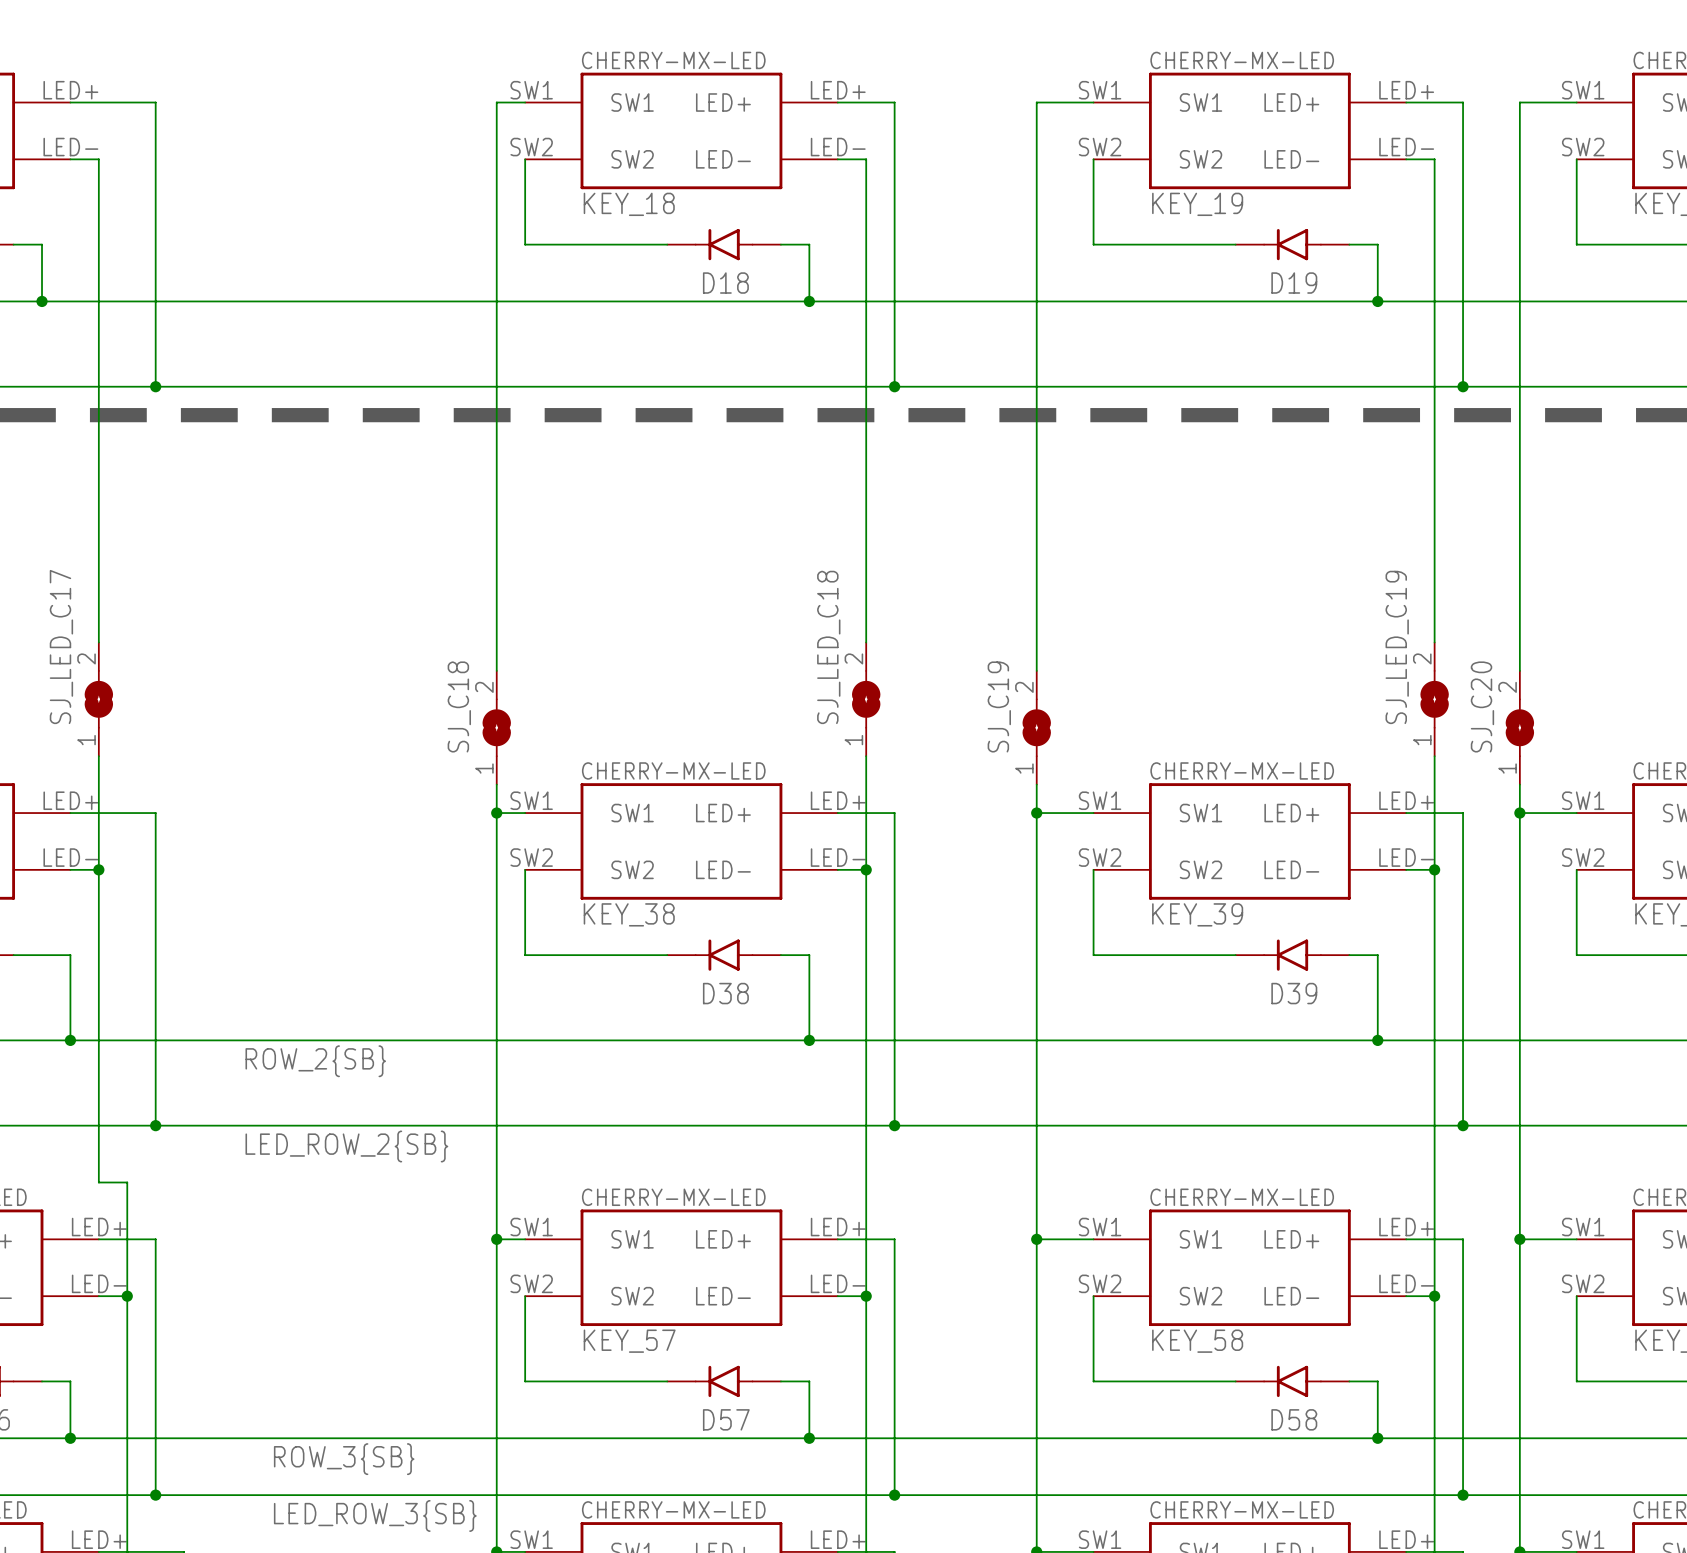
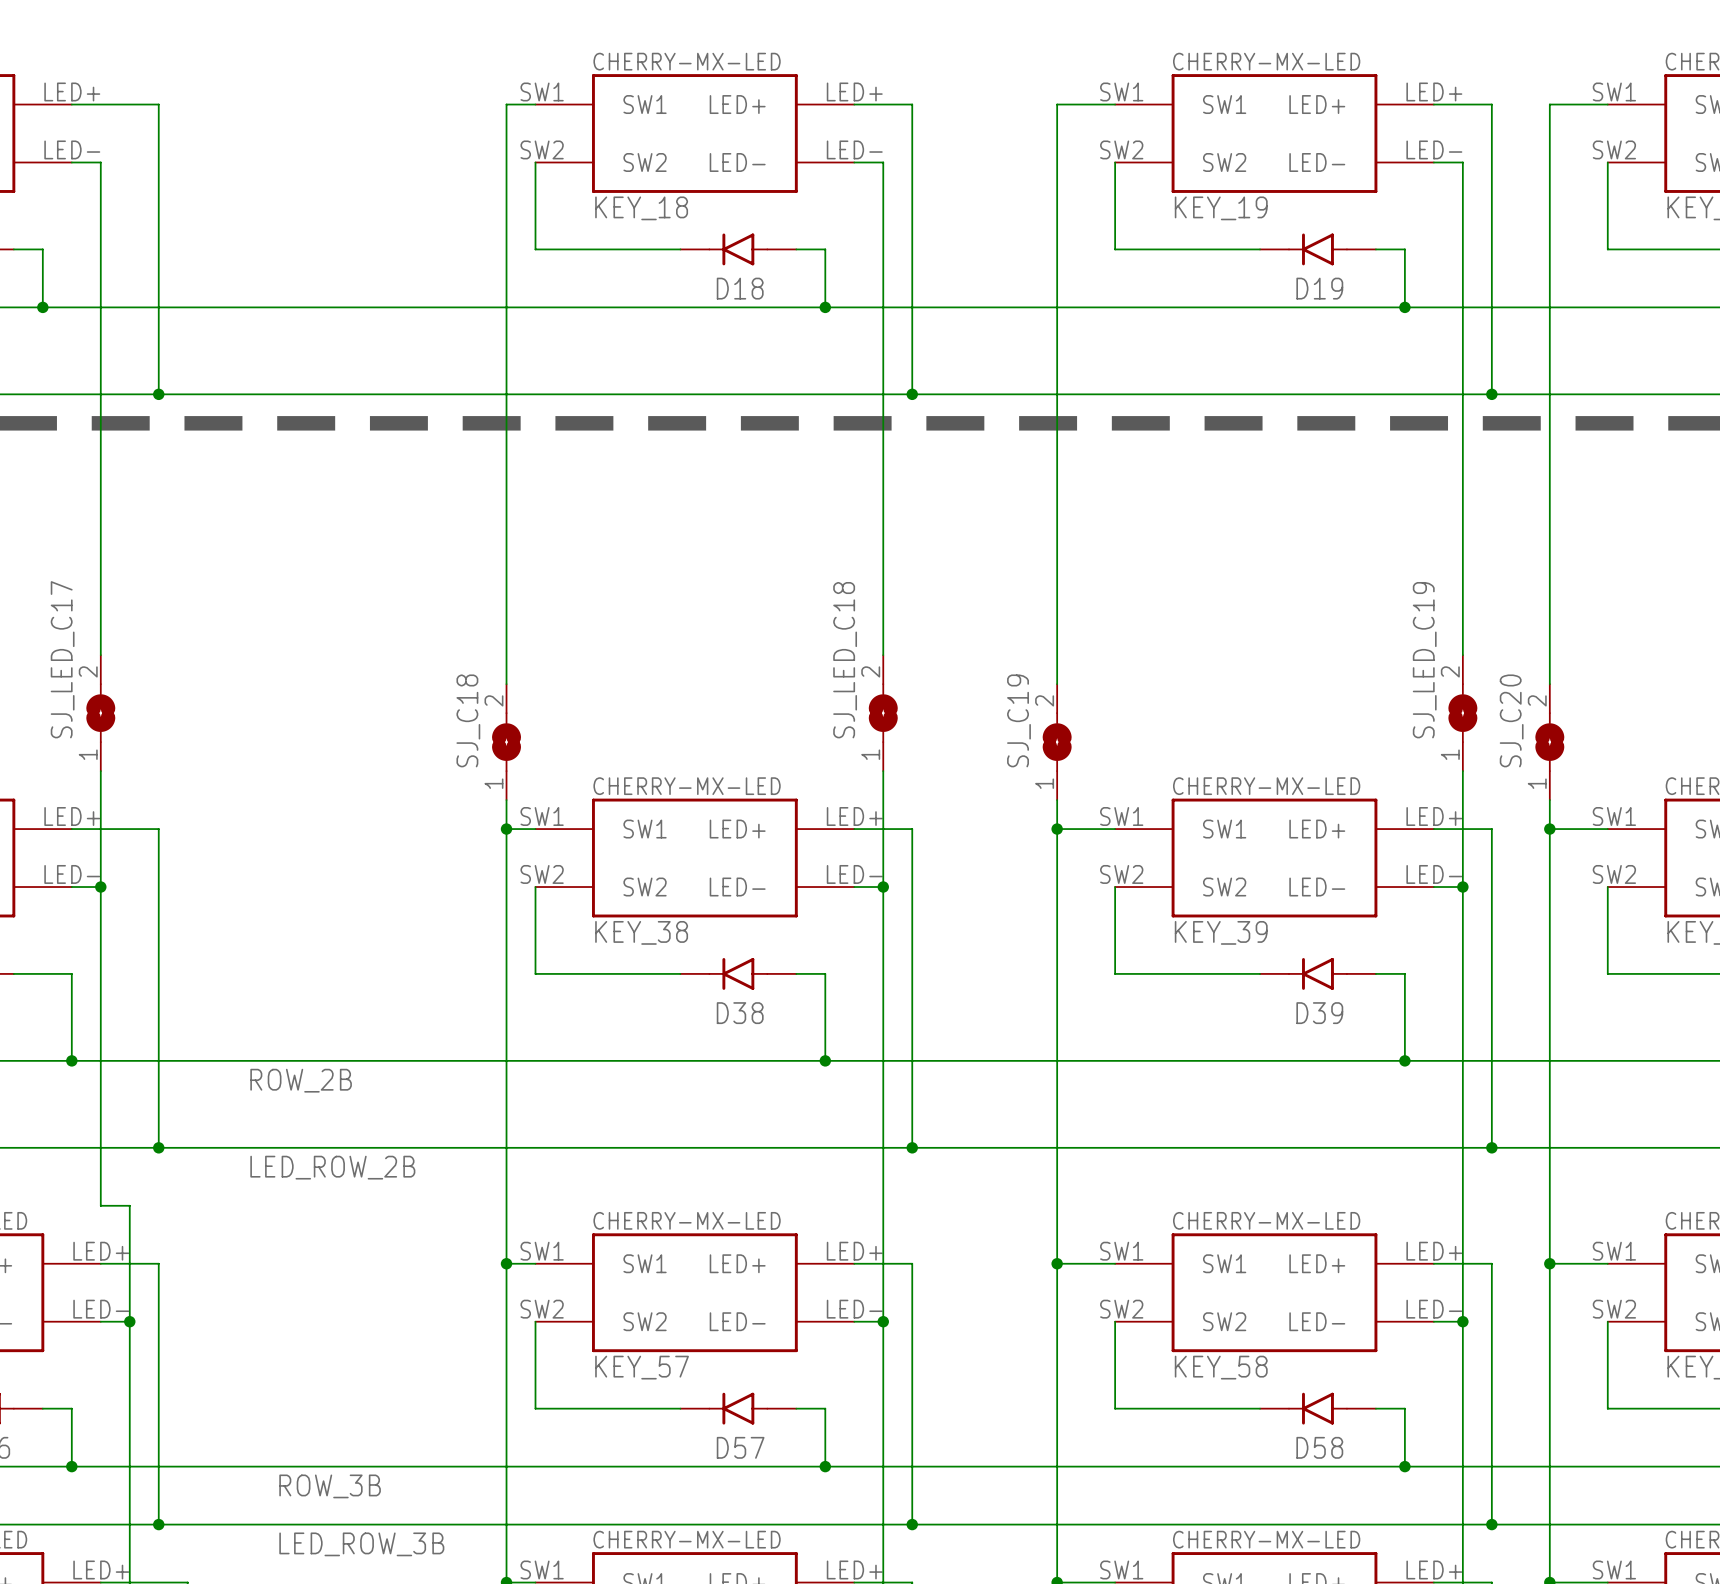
label: ROW_2{SB} (315, 1061) -> ROW_2B (301, 1080)
label: LED_ROW_2{SB} (346, 1146) -> LED_ROW_2B (332, 1167)
label: ROW_3{SB} (344, 1459) -> ROW_3B (330, 1486)
label: LED_ROW_3{SB} (375, 1515) -> LED_ROW_3B (361, 1544)

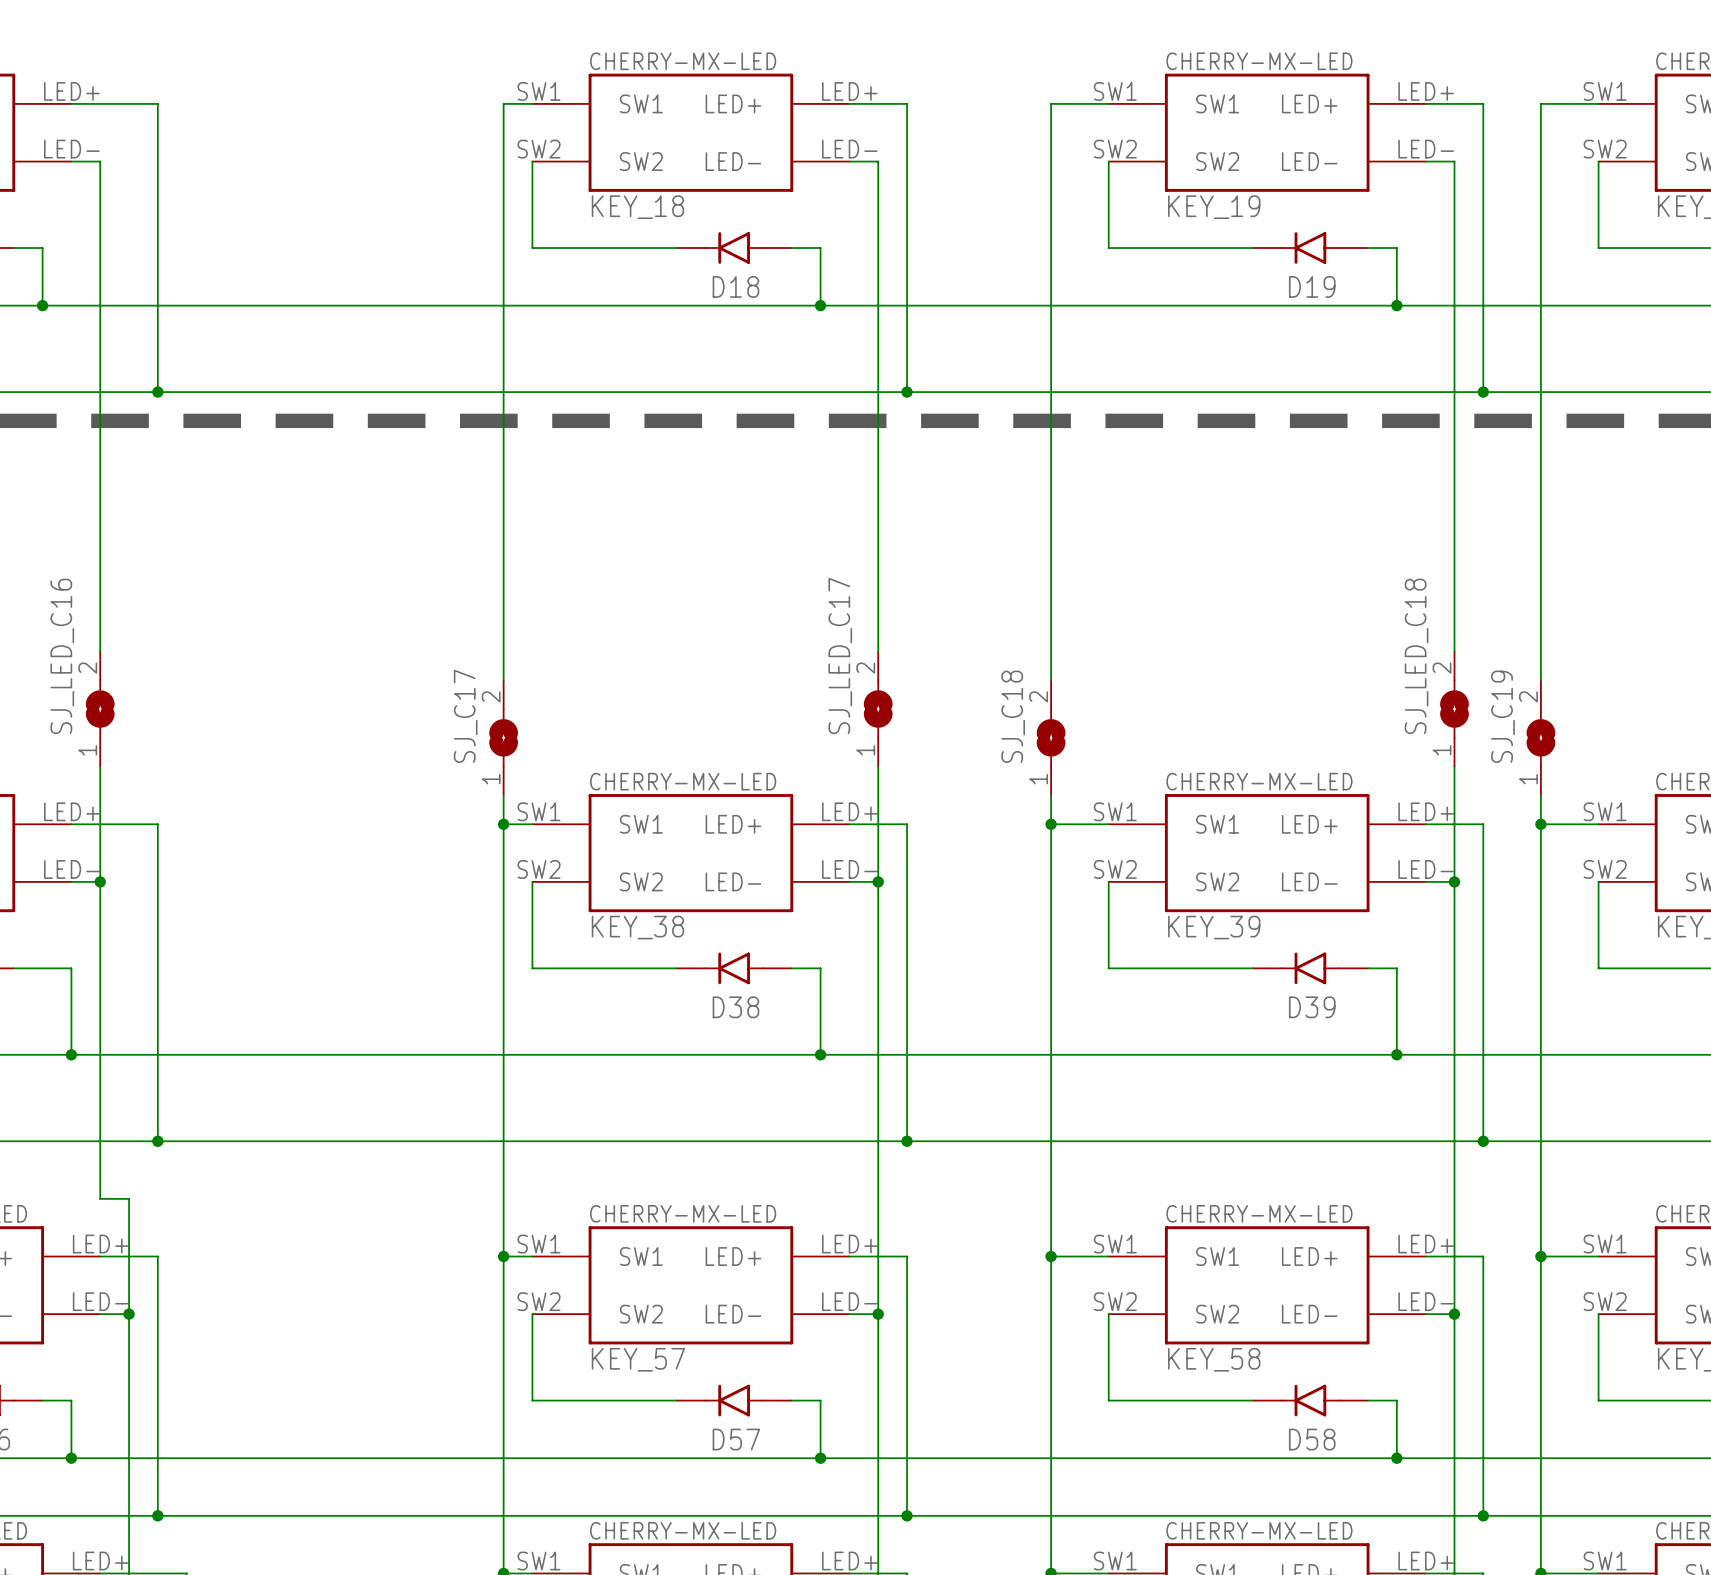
SJ_LED_C17 name: SJ_LED_C17 (62, 659) -> SJ_LED_C16 (62, 656)
SJ_LED_C18 name: SJ_LED_C18 (845, 660) -> SJ_LED_C17 (840, 655)
SJ_LED_C19 name: SJ_LED_C19 (1424, 660) -> SJ_LED_C18 (1416, 656)
SJ_C18 name: SJ_C18 (468, 720) -> SJ_C17 (465, 716)
SJ_C19 name: SJ_C19 (1018, 720) -> SJ_C18 (1013, 716)
SJ_C20 name: SJ_C20 (1511, 720) -> SJ_C19 (1503, 716)
label: ROW_2B (301, 1080) -> none
label: LED_ROW_2B (332, 1167) -> none
label: ROW_3B (330, 1486) -> none
label: LED_ROW_3B (361, 1544) -> none

